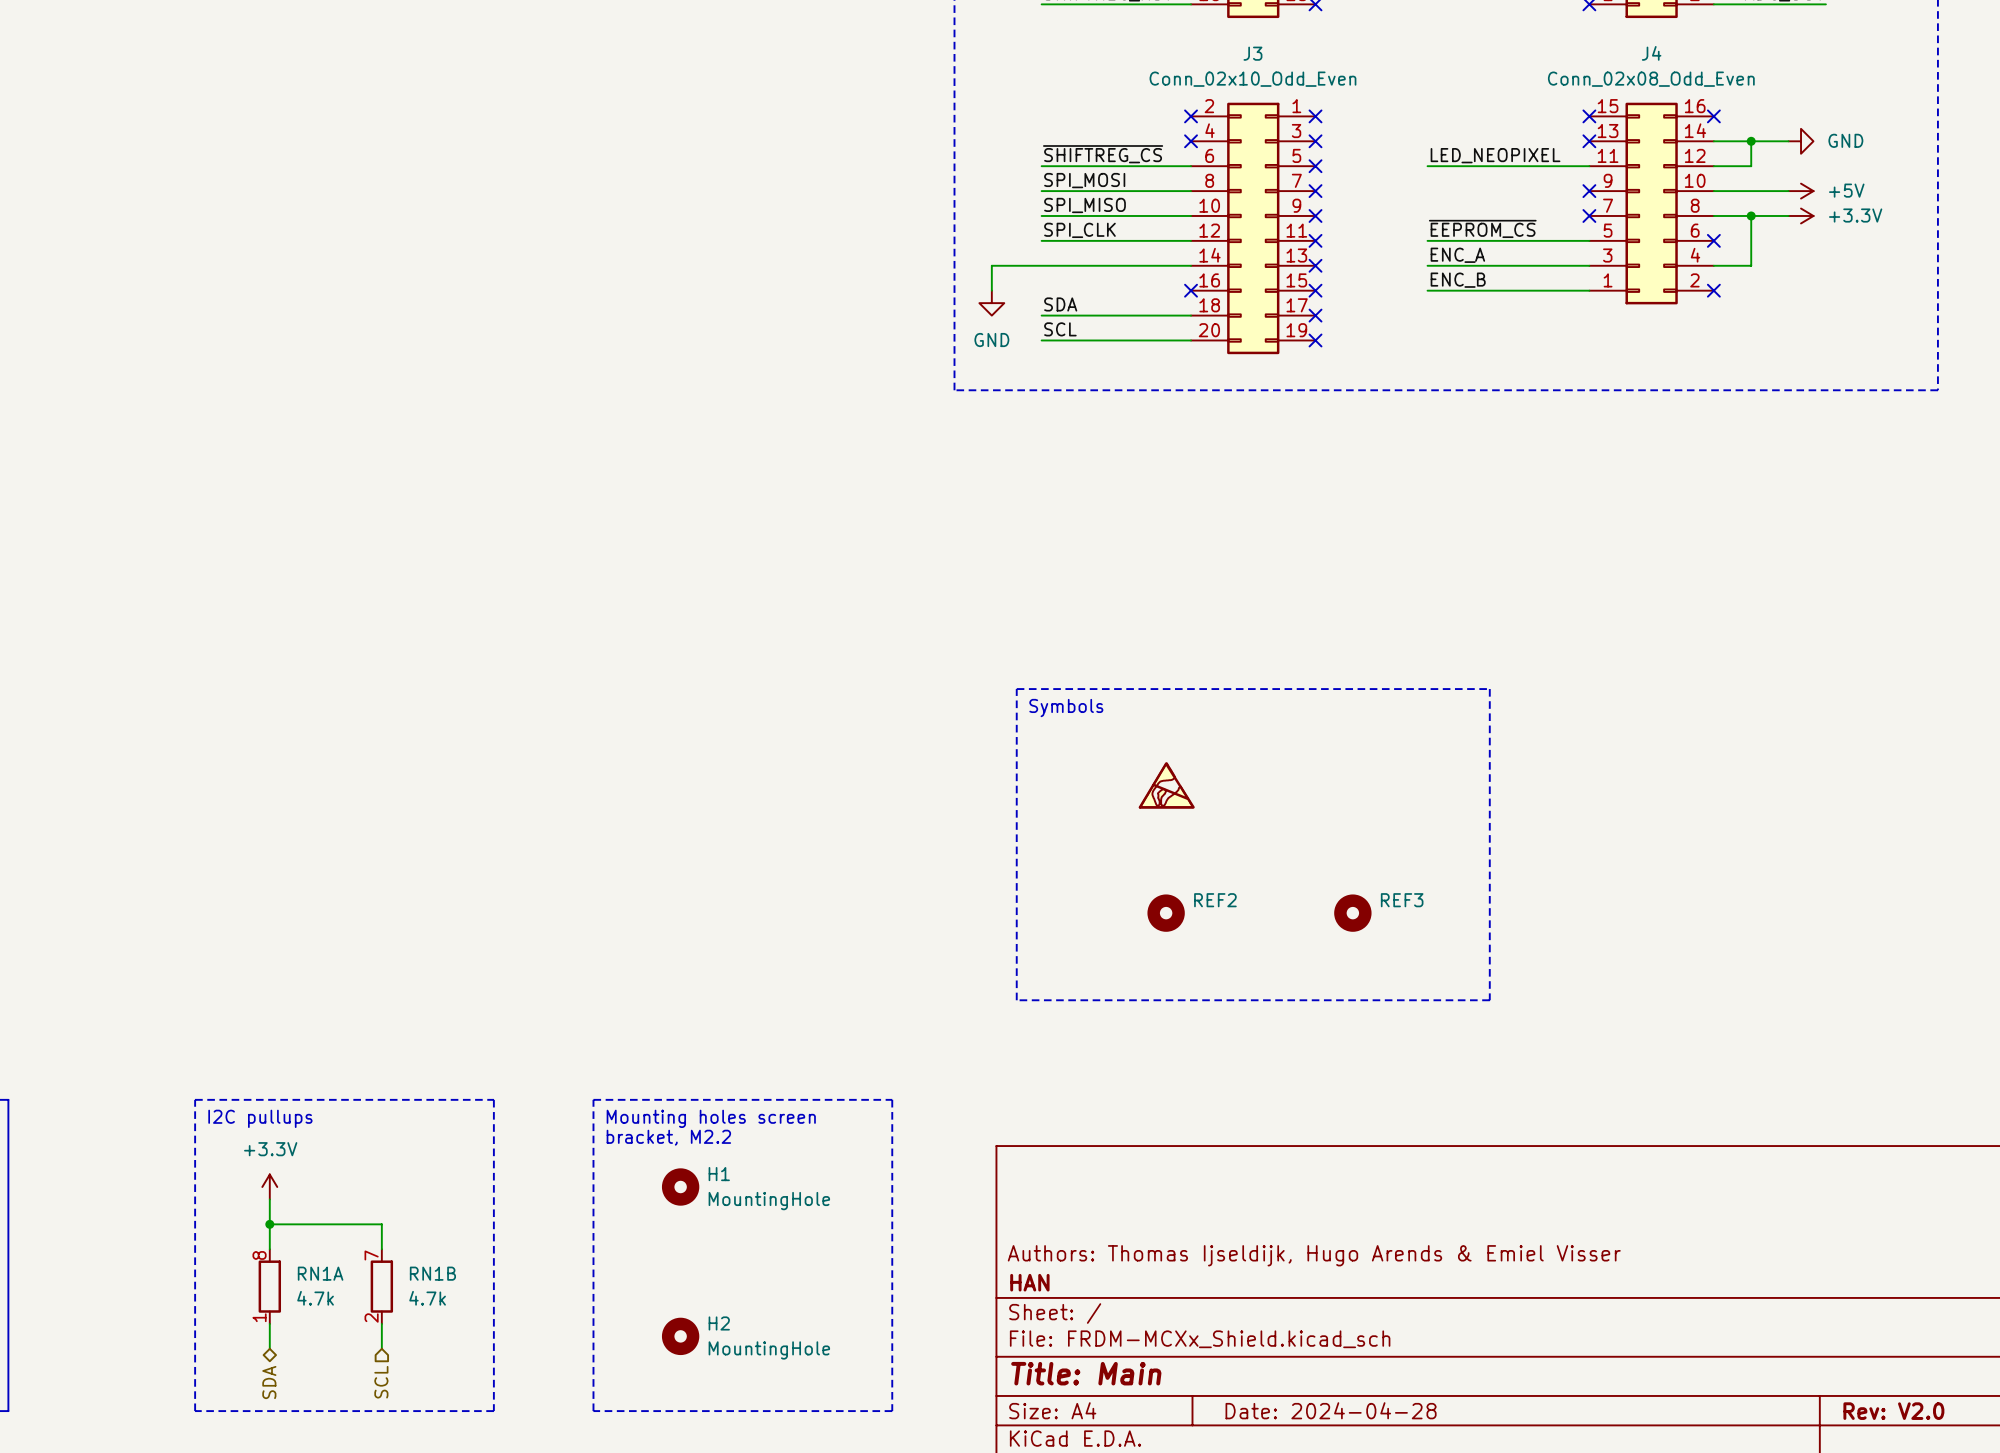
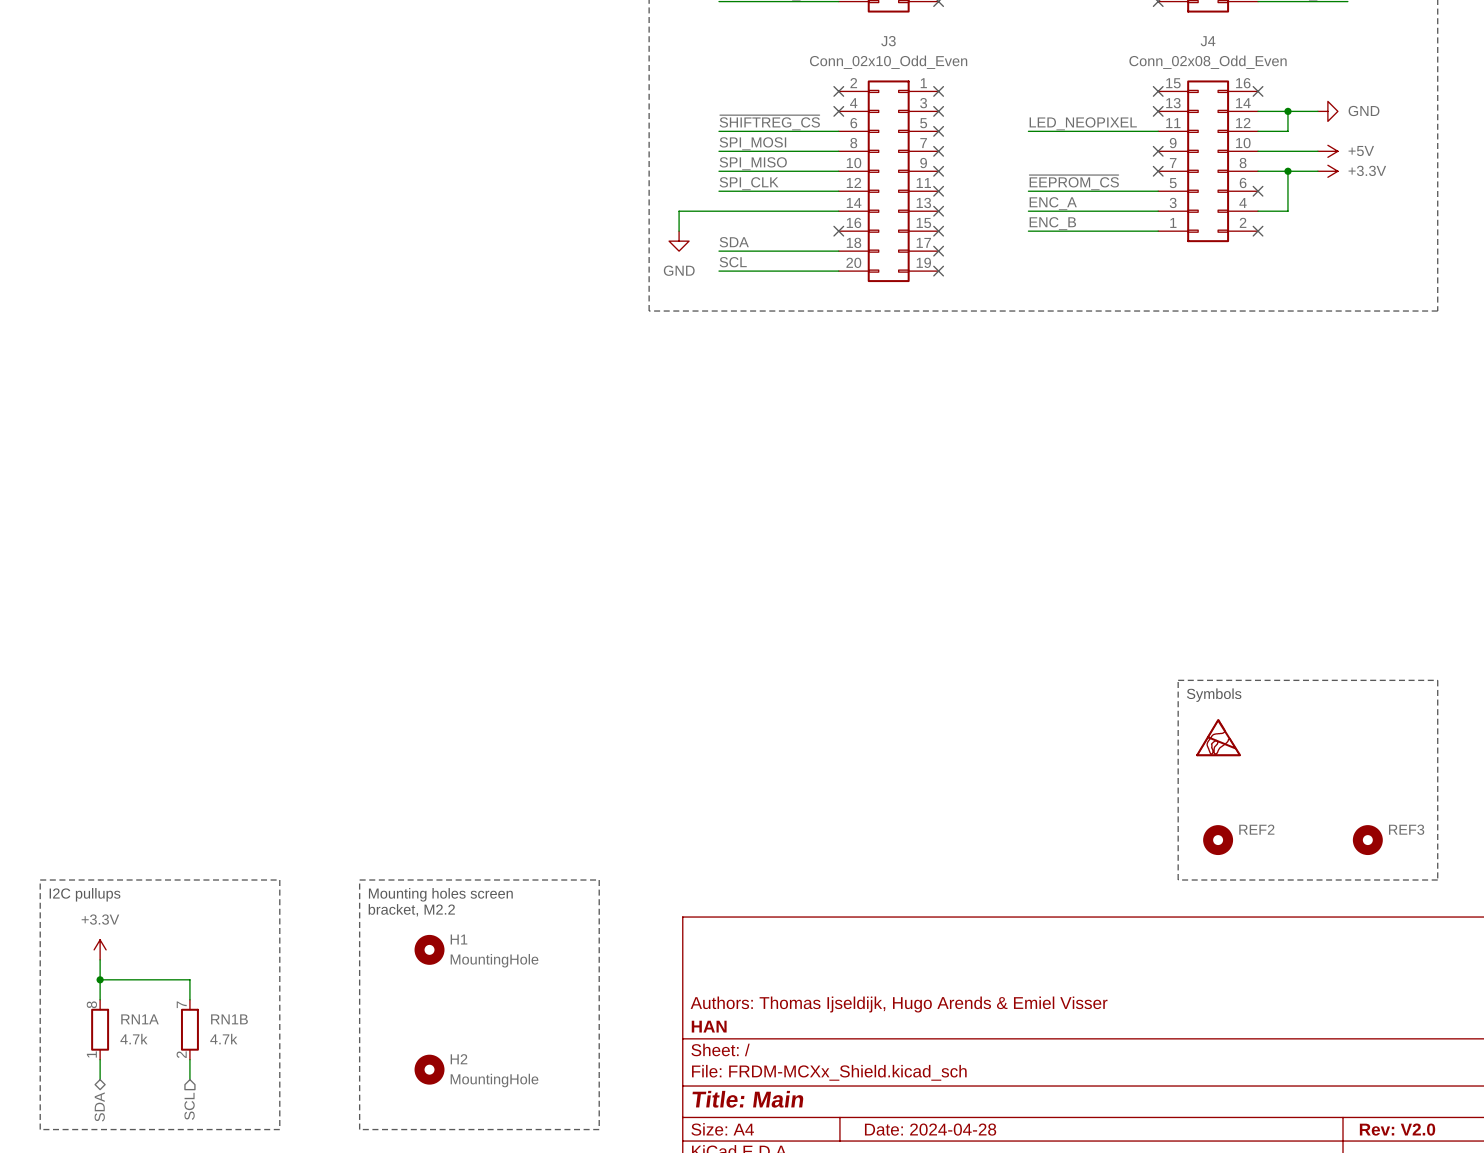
line: (1016, 689) (1489, 689) (1489, 1000) (1016, 1000) (1016, 689) -> none
text: Symbols (1066, 708) -> none
part: (1166, 785) -> none
line: none -> (1178, 680) (1437, 680) (1437, 880) (1178, 880) (1178, 680)
text: none -> Symbols (1214, 695)
REF2 position: (1166, 913) -> (1218, 840)
REF3 position: (1352, 913) -> (1367, 840)
part: none -> (1218, 737)

